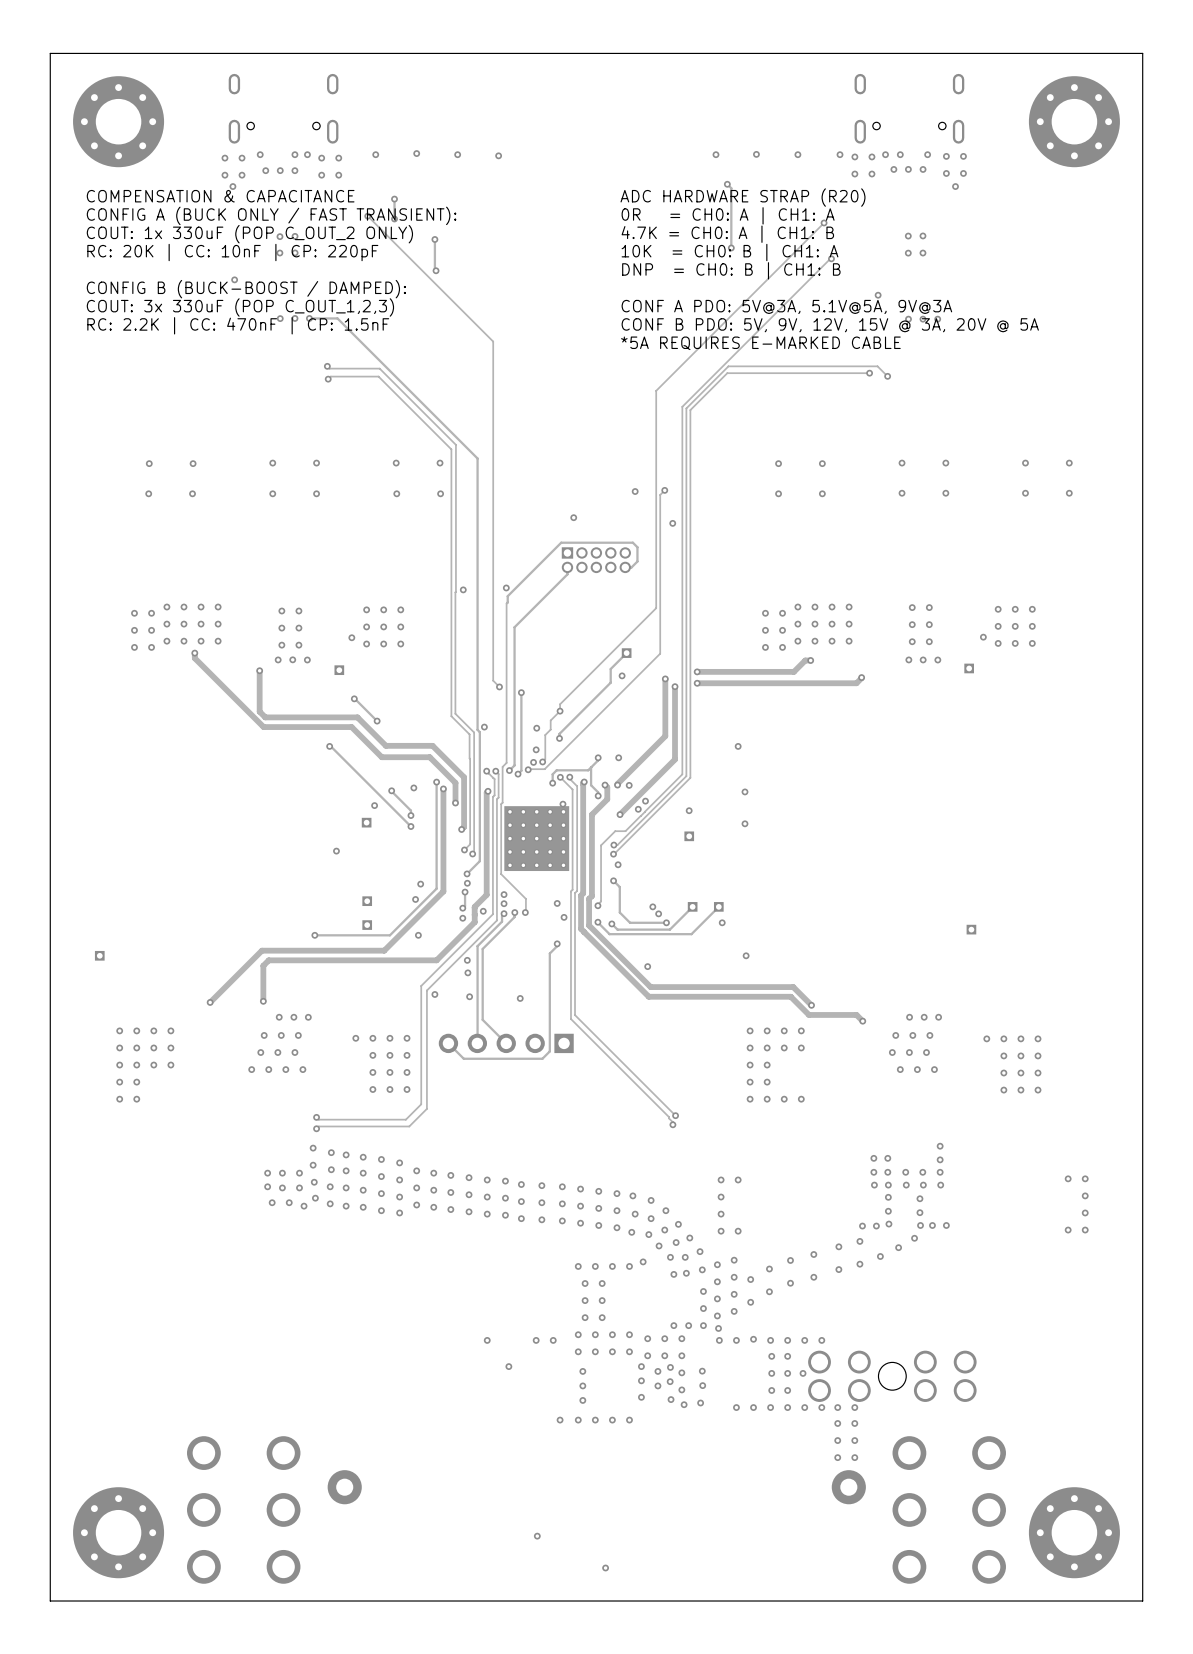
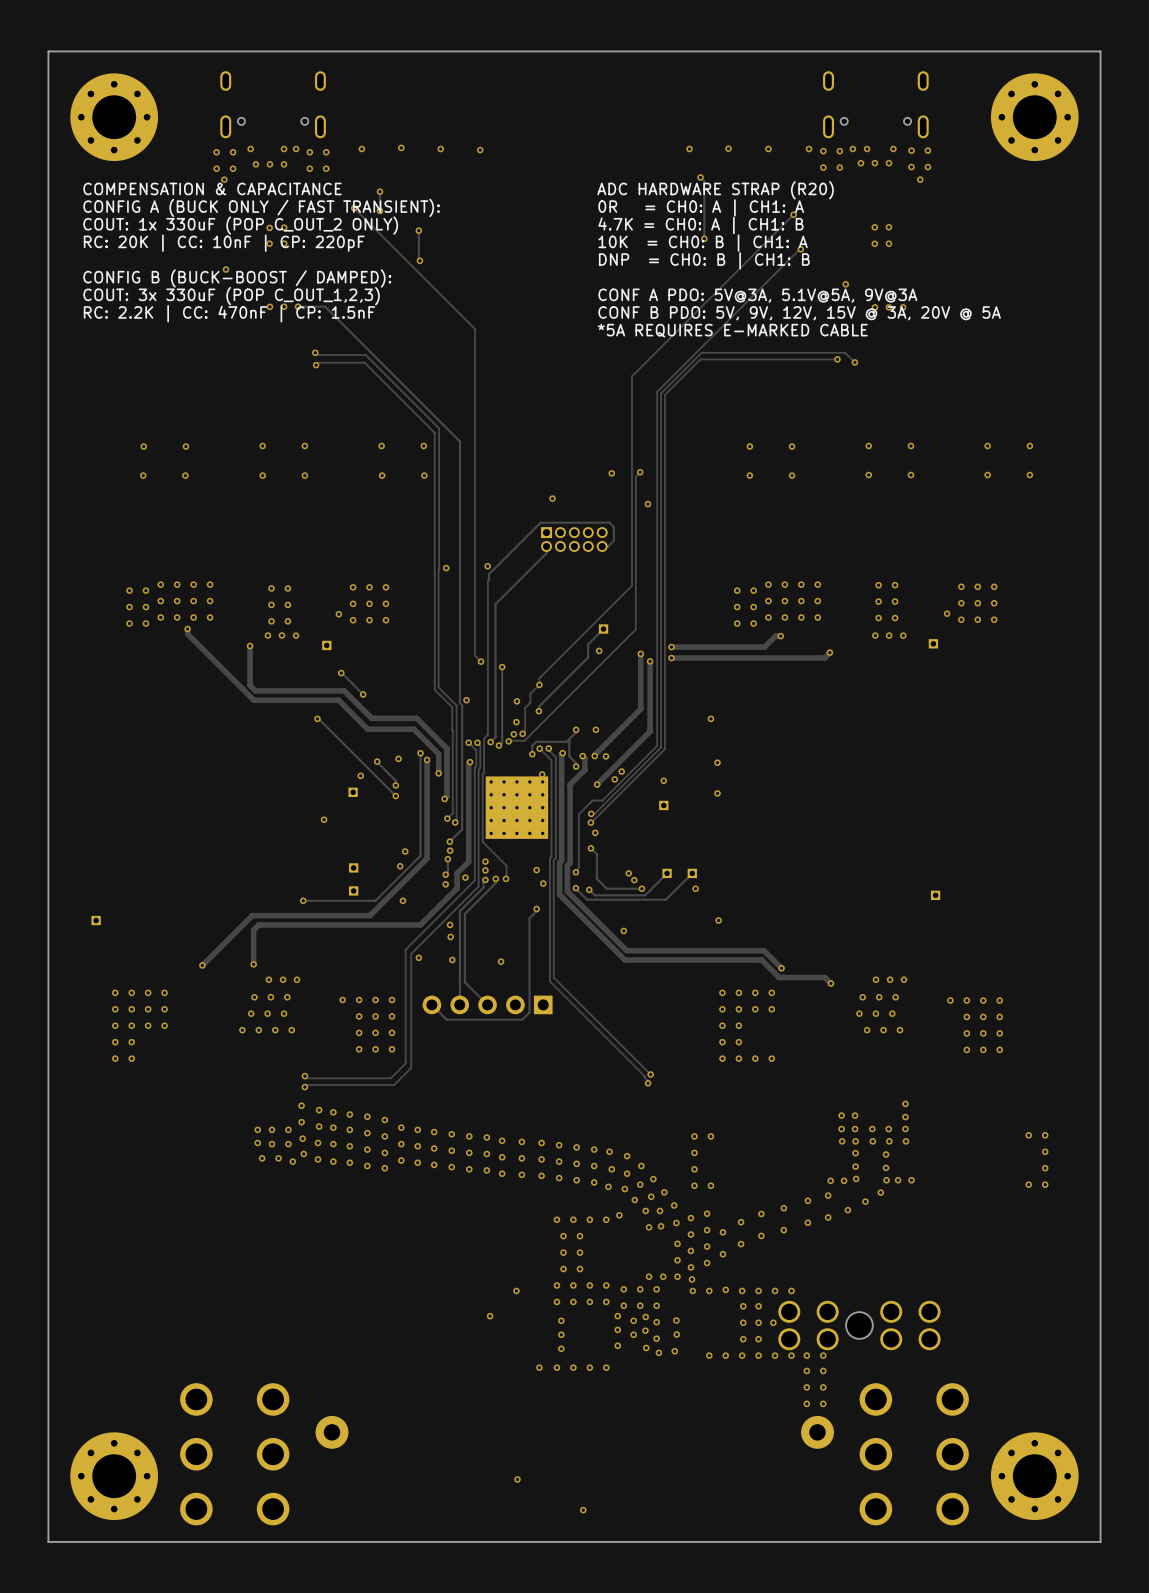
via: (487, 1340) -> none
via: (553, 1340) -> none

